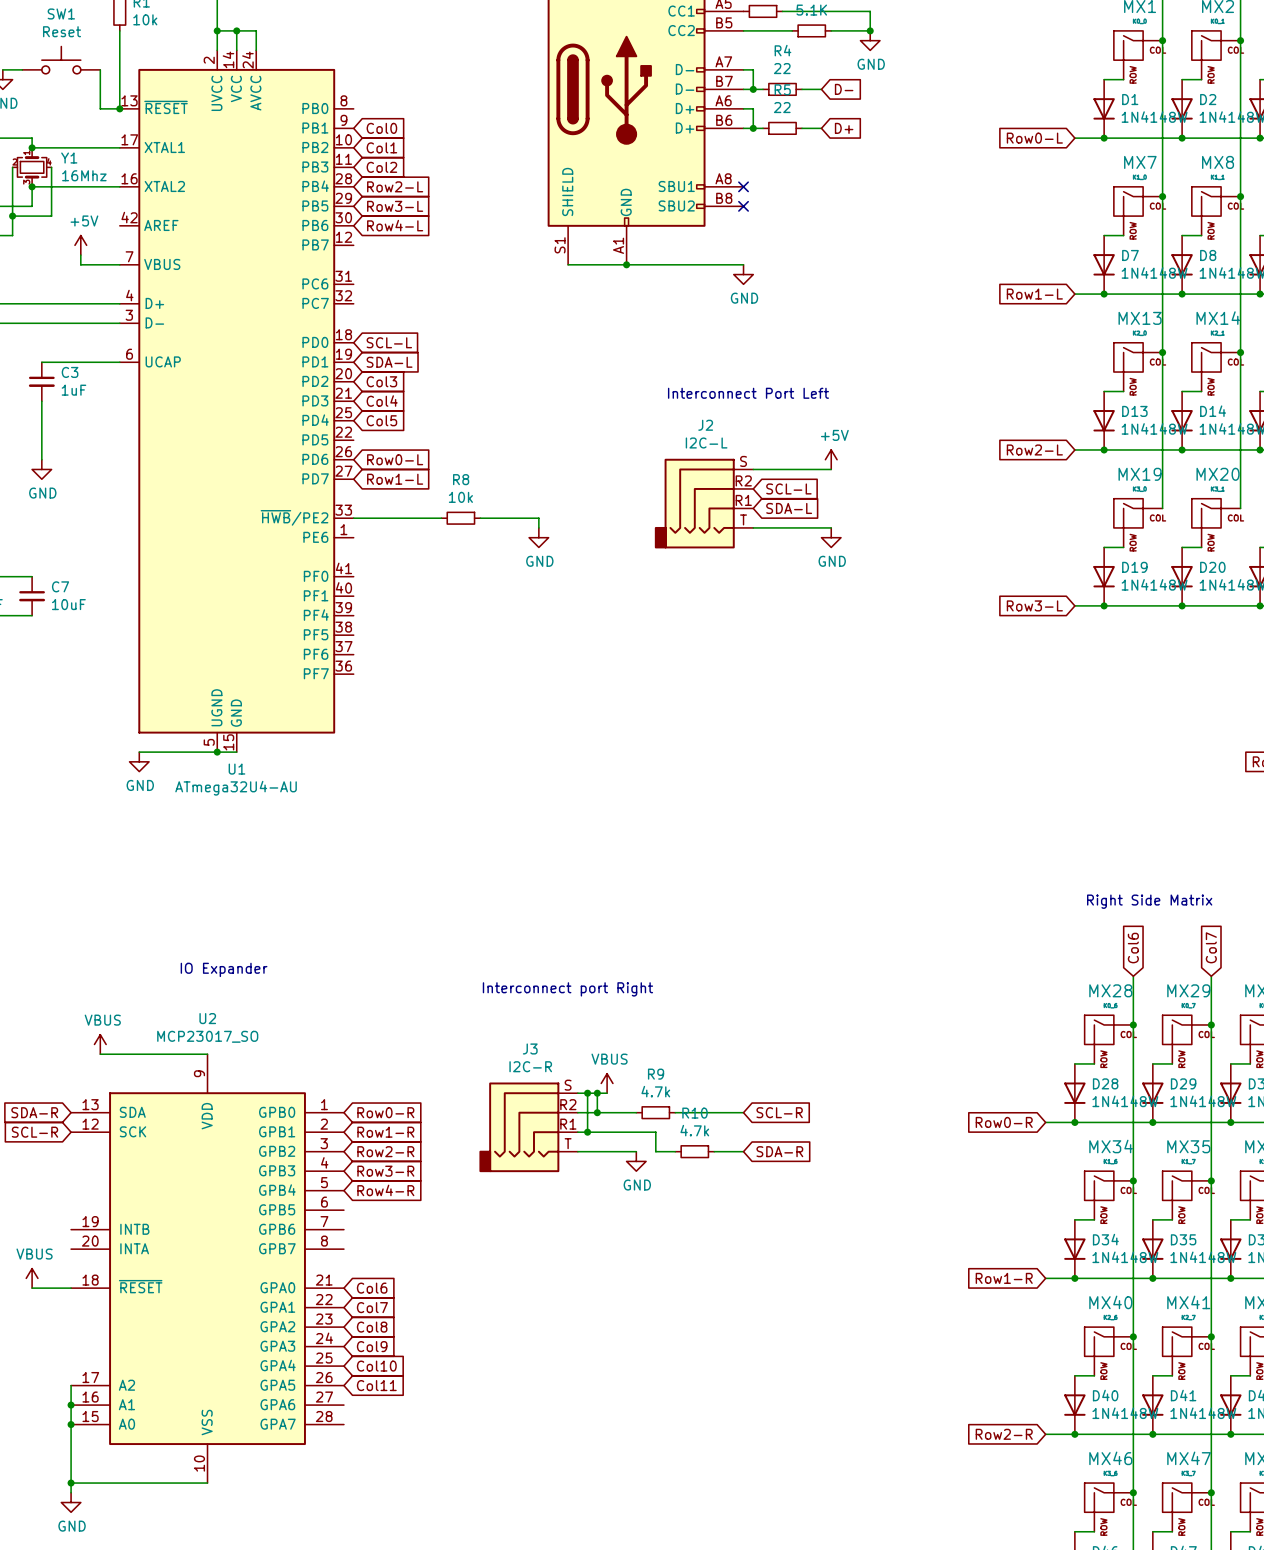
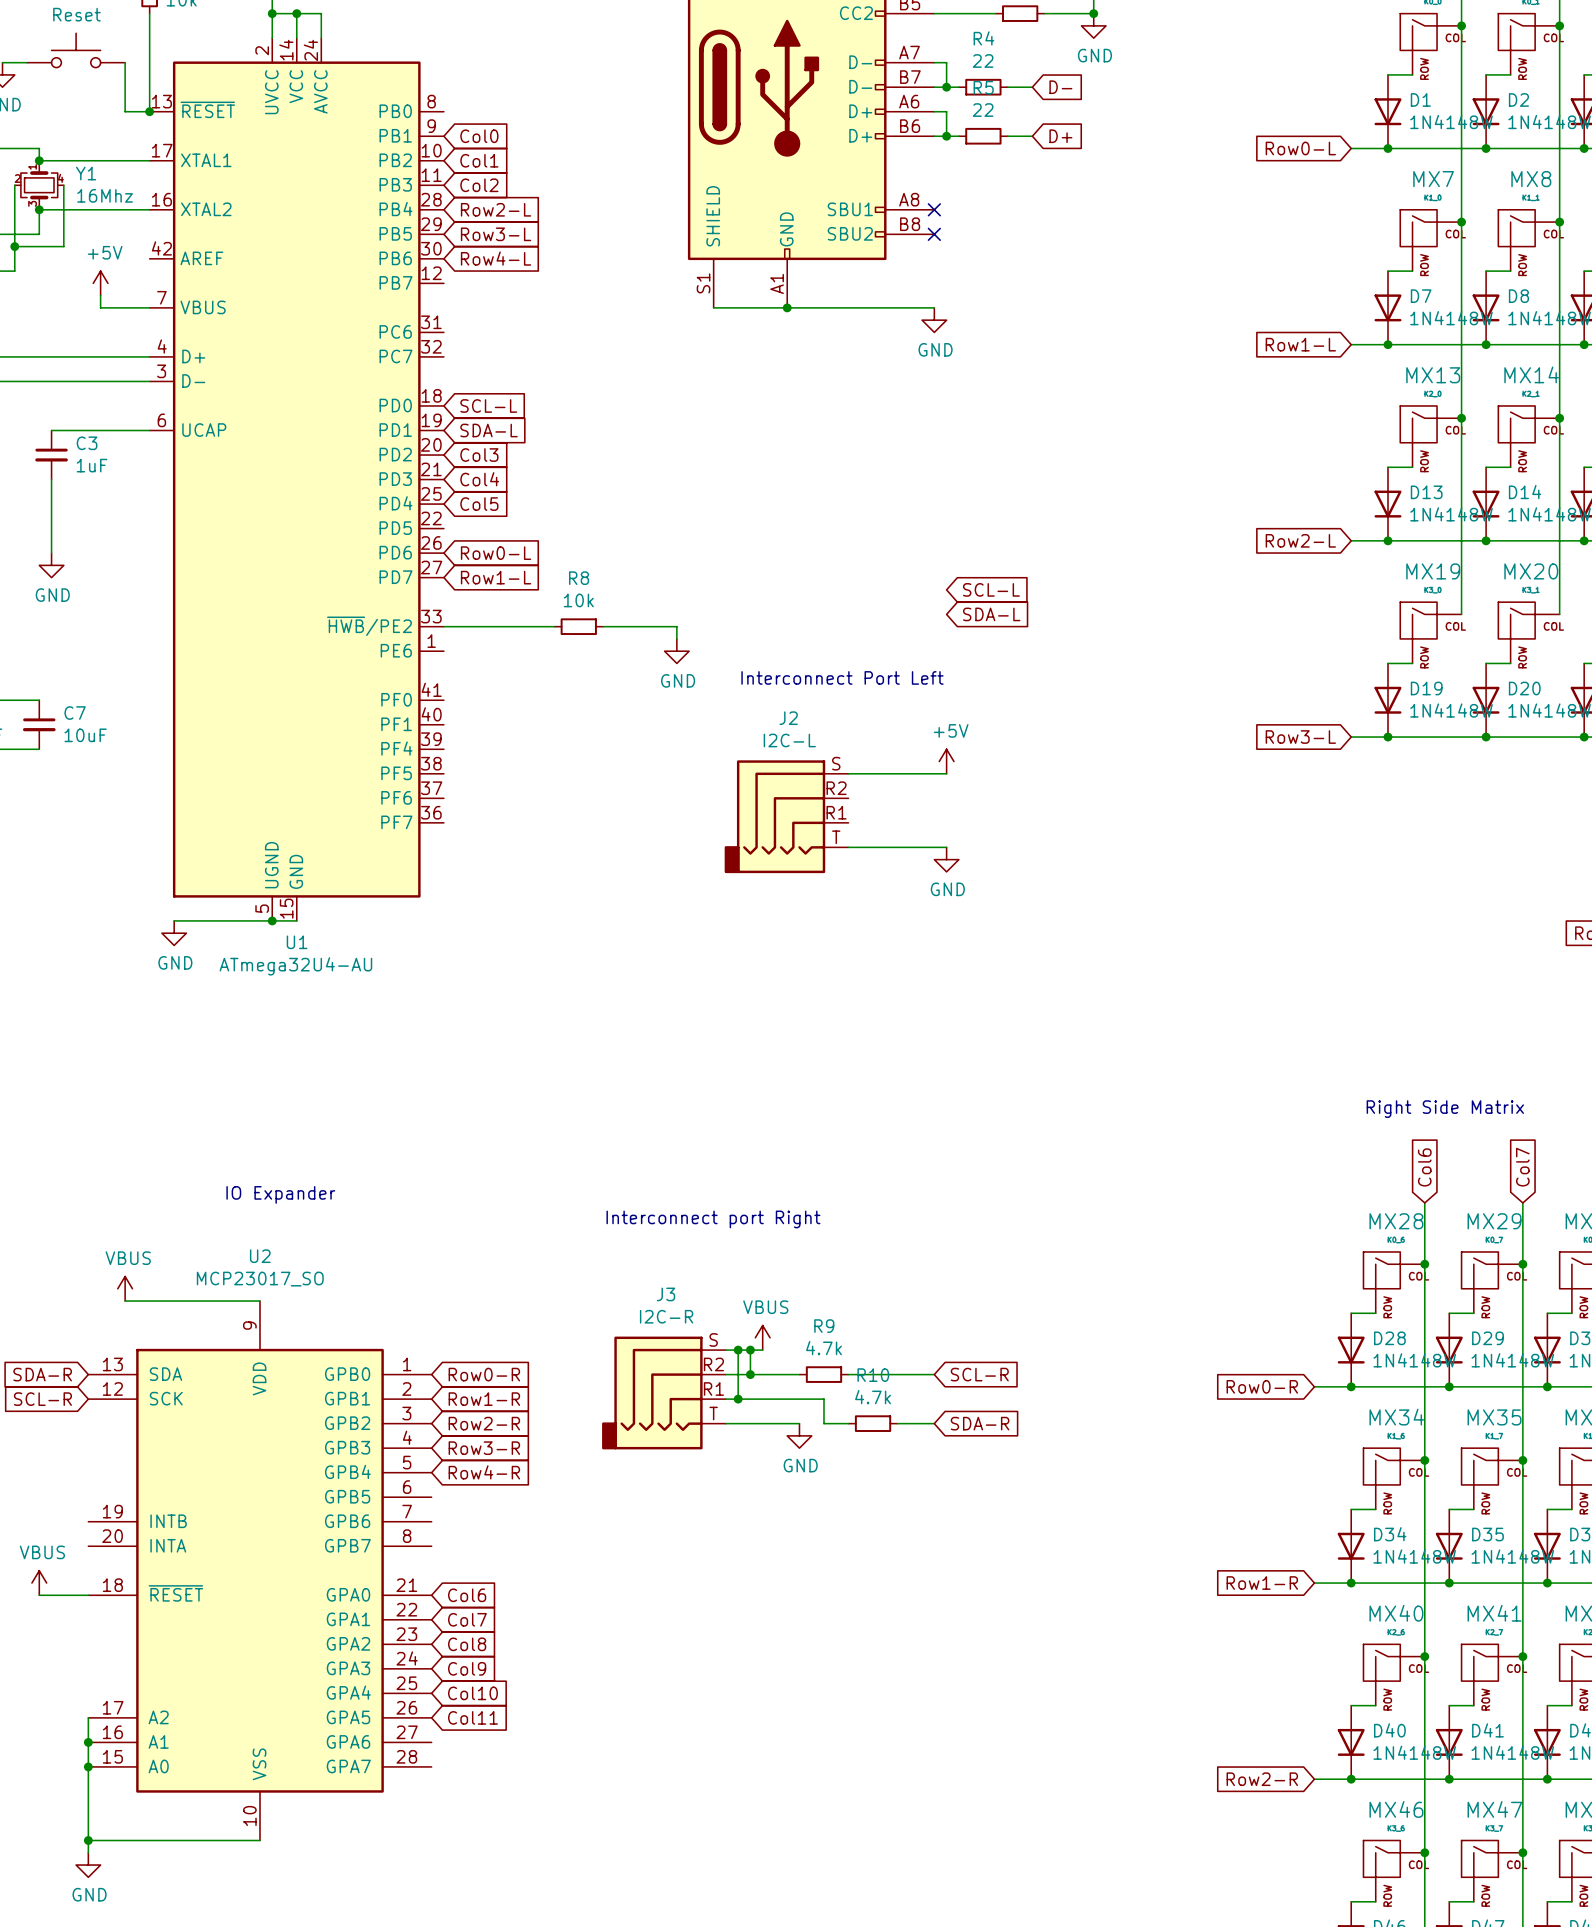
text position: Interconnect Port Left (748, 393) -> Interconnect Port Left (842, 677)
power symbol position: +5V (831, 459) -> +5V (946, 761)
wire: (753, 469) (831, 469) -> (848, 773) (946, 773)
J2 position: (704, 503) -> (786, 816)
wire: (753, 527) (831, 527) -> (848, 847) (946, 847)
power symbol position: GND (831, 537) -> GND (946, 859)

